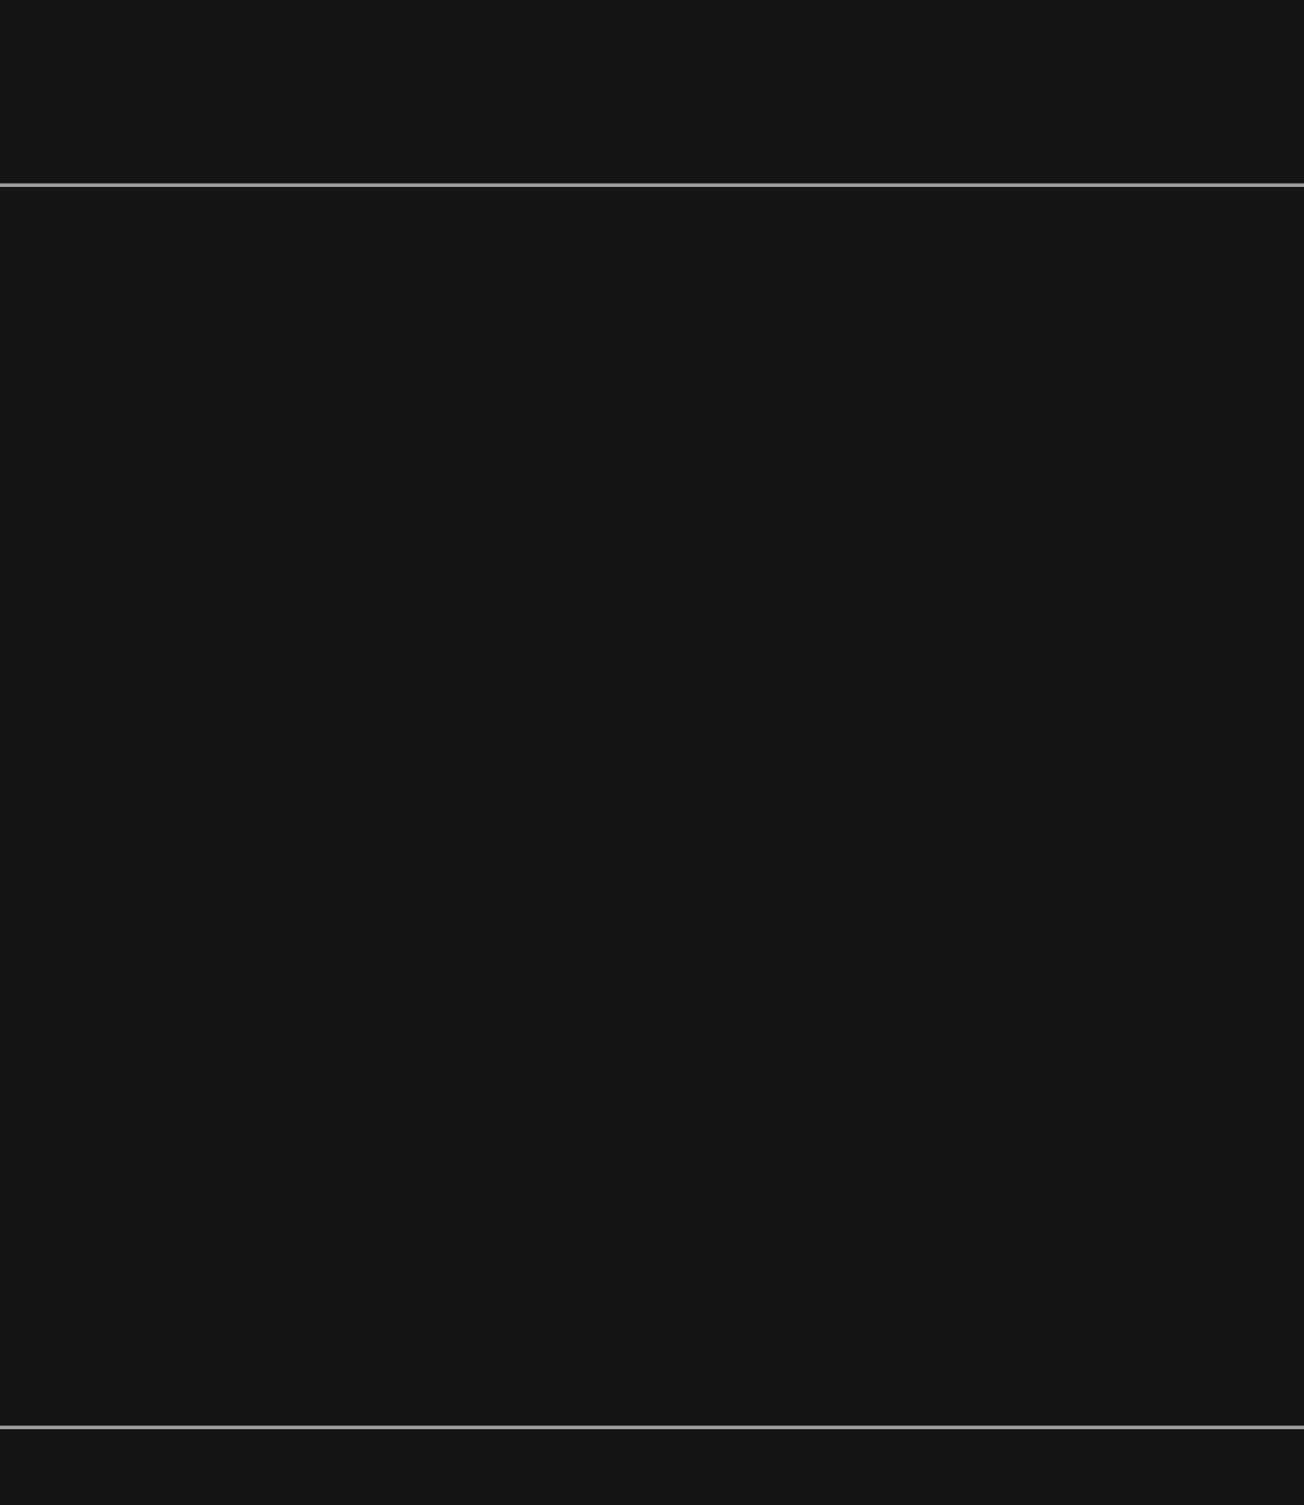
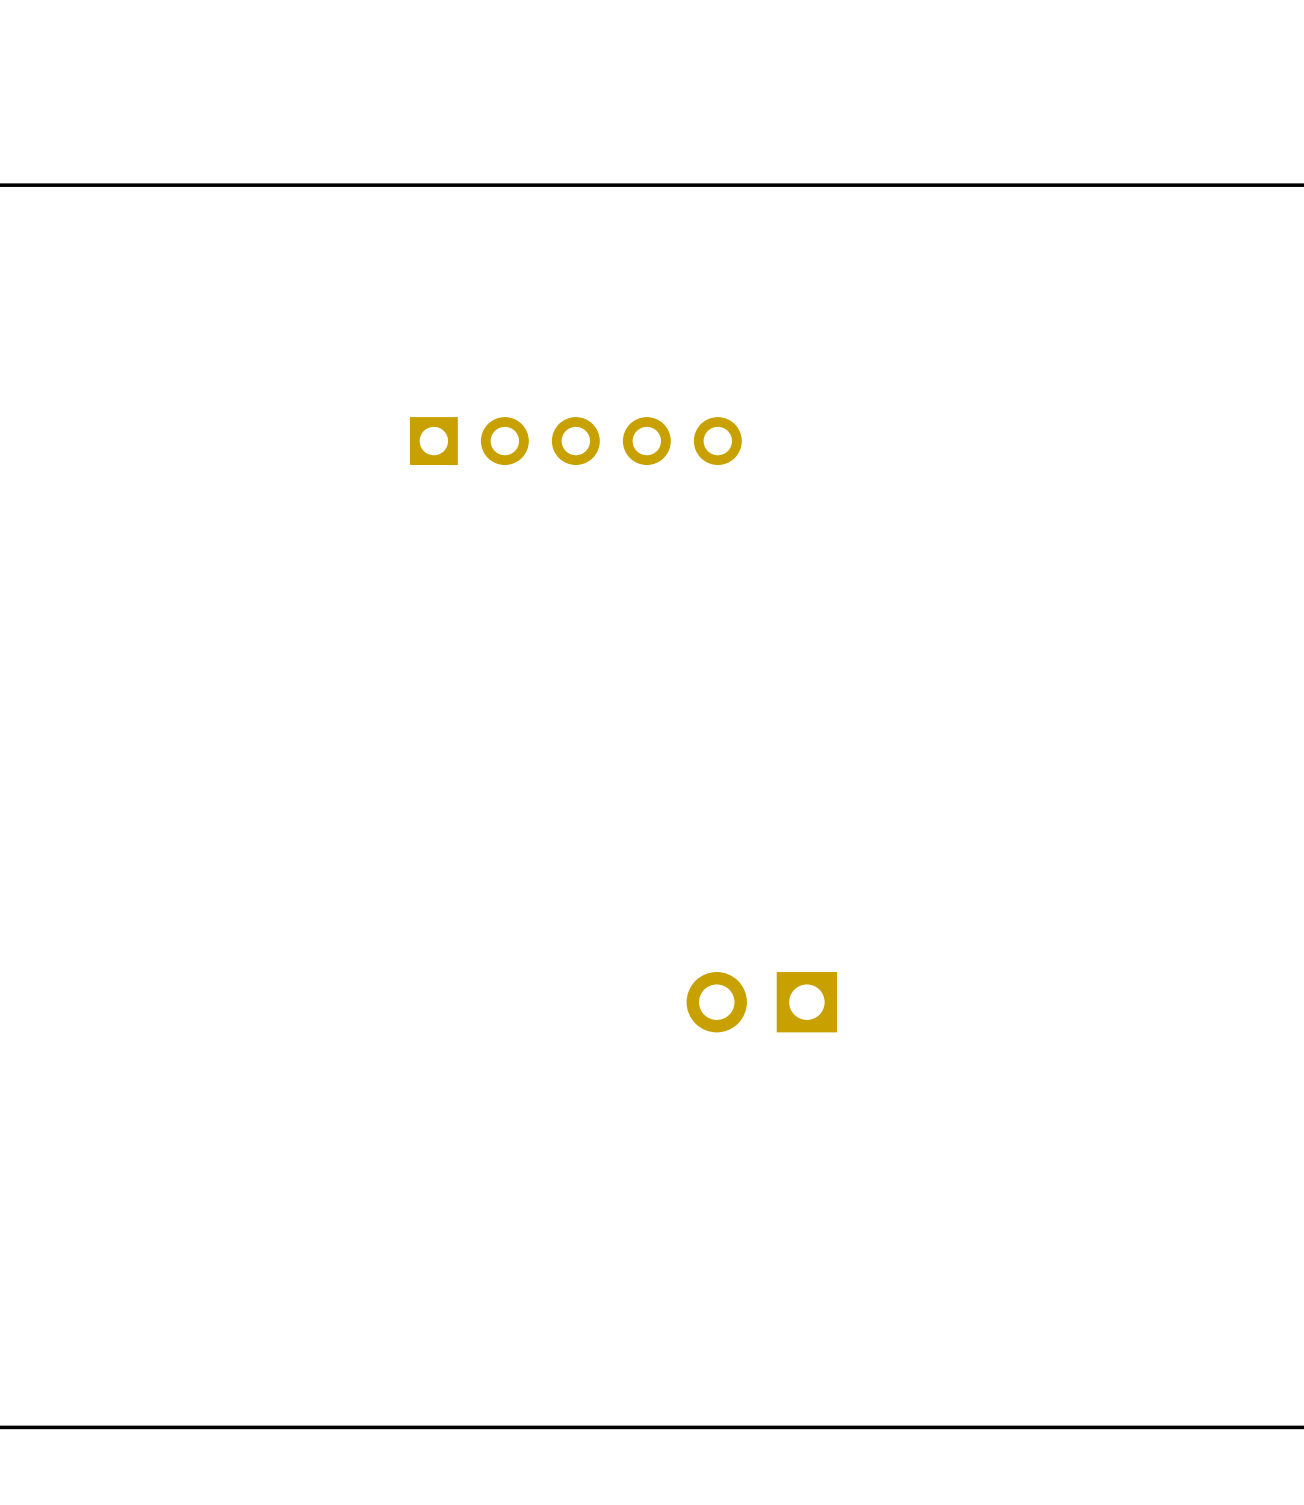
part: none -> (575, 441)
part: none -> (761, 1002)

